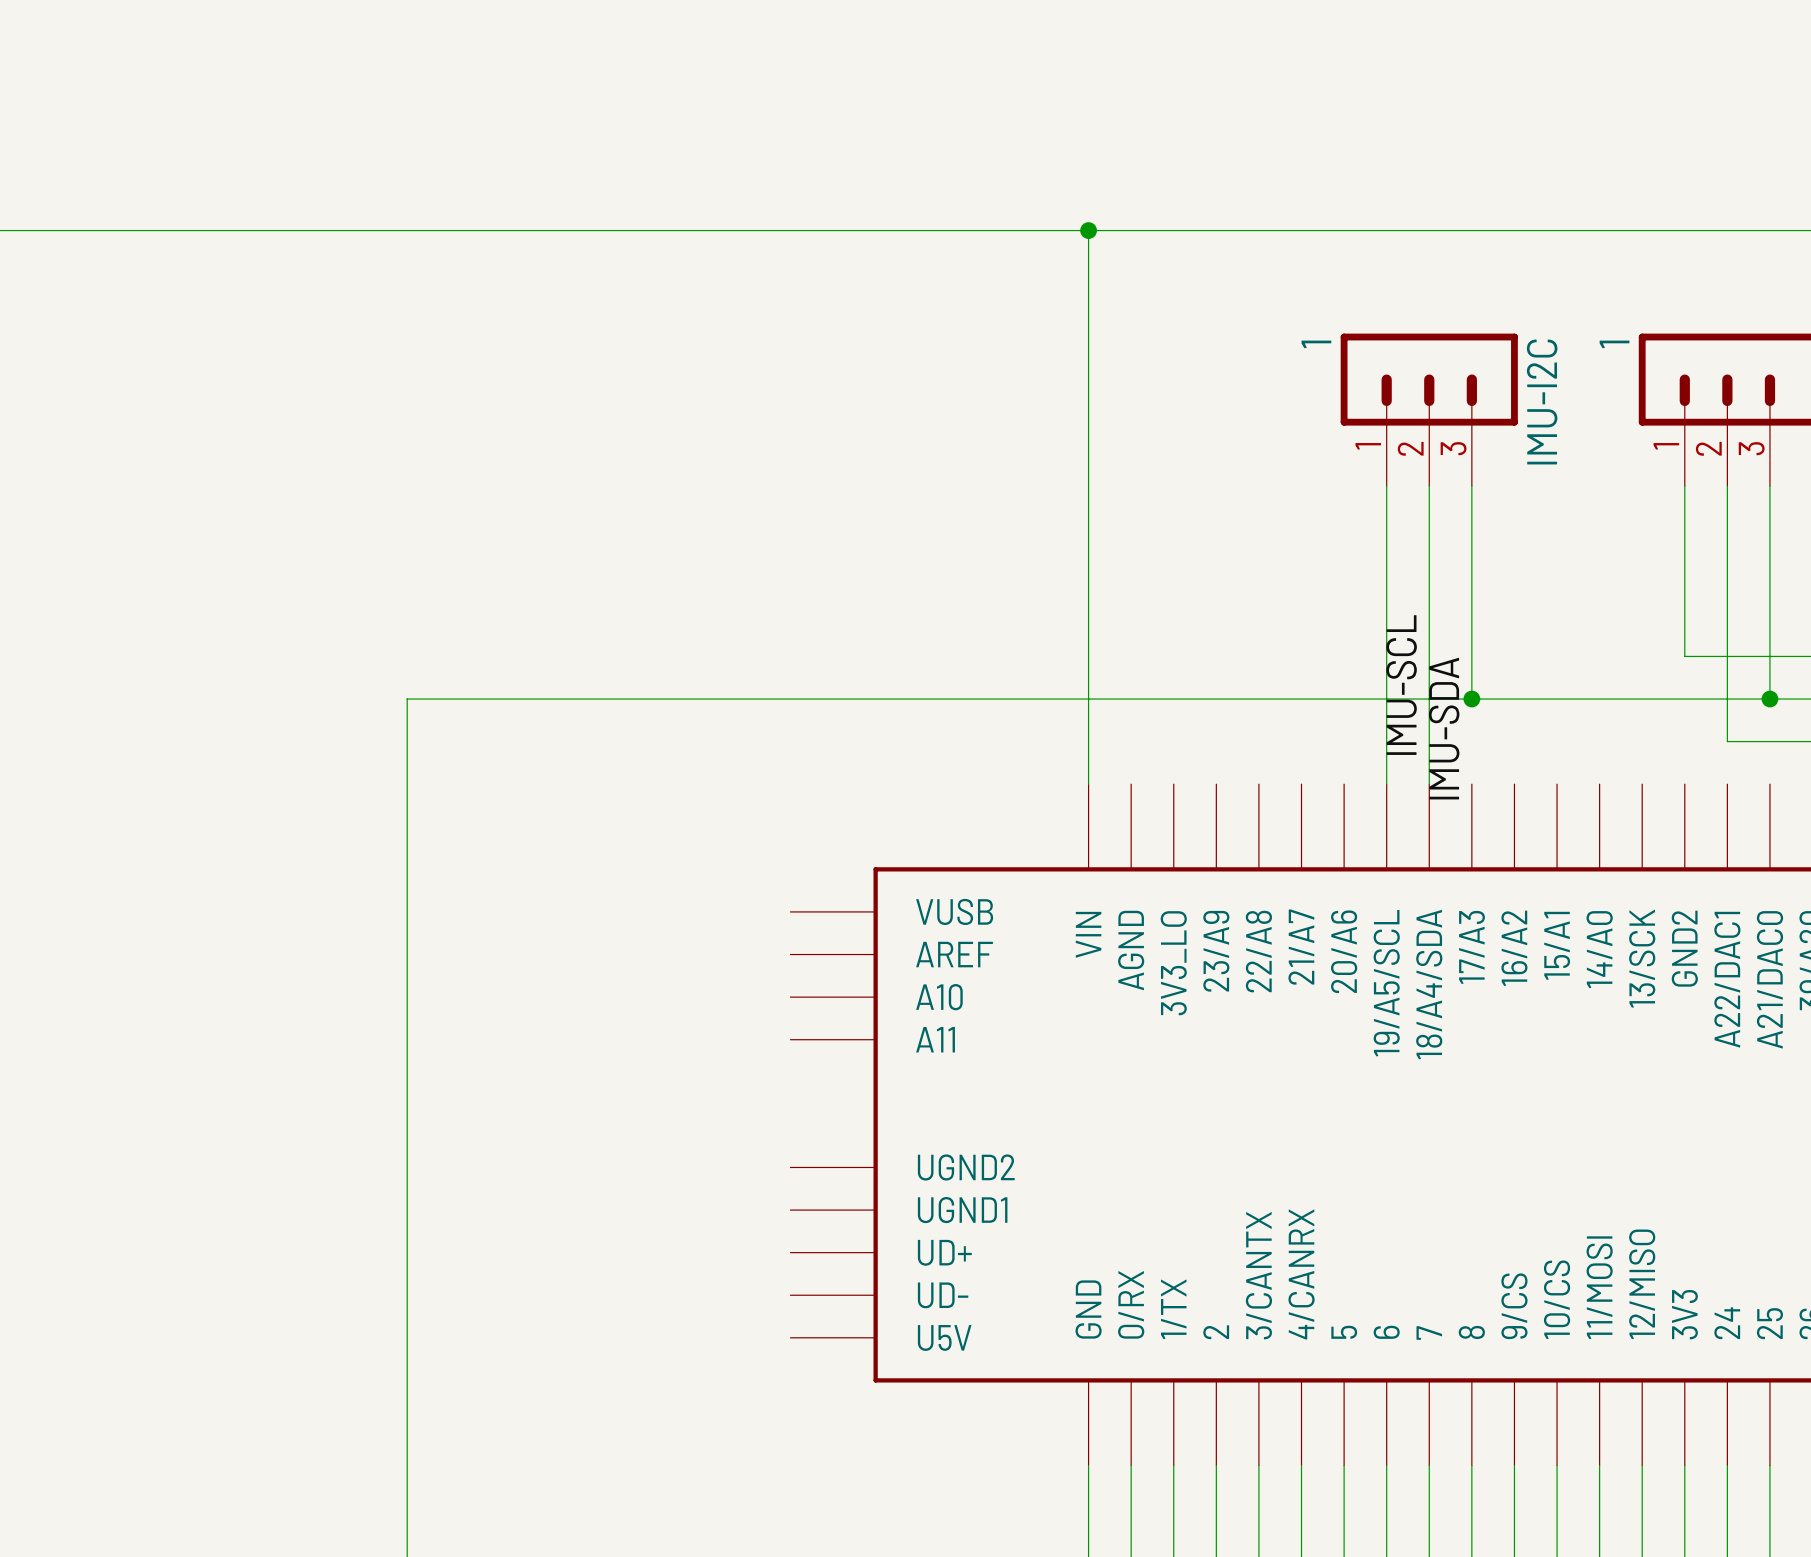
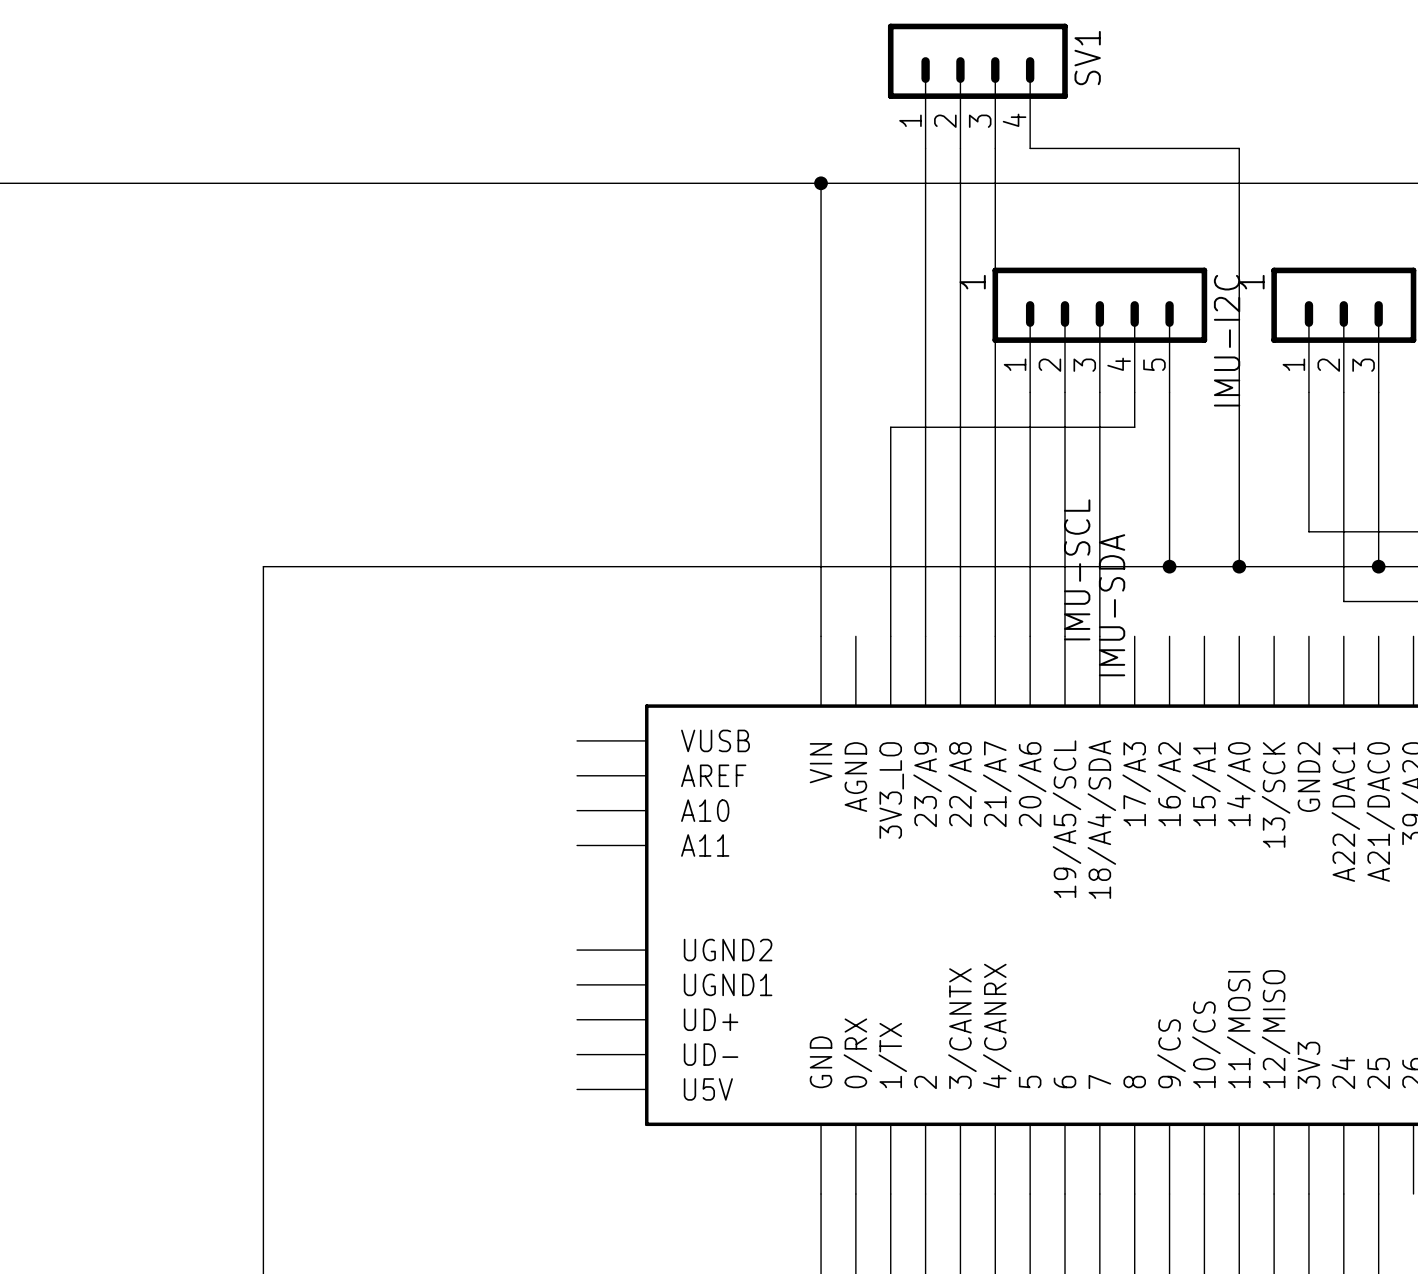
SV1: none -> (977, 86)
wire: none -> (925, 148) (925, 636)
wire: none -> (960, 148) (960, 636)
wire: none -> (995, 148) (995, 636)
wire: none -> (1030, 148) (1239, 148) (1239, 566)
IMU-I2C symbol: [1340, 333, 1518, 487] -> [992, 267, 1208, 393]
IMU-I2C value position: 1 (1316, 344) -> 1 (972, 282)
IMU-I2C name position: IMU-I2C (1542, 401) -> IMU-I2C (1227, 340)
wire: none -> (1030, 392) (1030, 636)
wire: none -> (1169, 392) (1169, 566)
wire: (1471, 528) (1471, 699) -> (1134, 427) (890, 427) (890, 636)
junction position: (1471, 699) -> (1169, 566)
junction: none -> (1239, 566)

